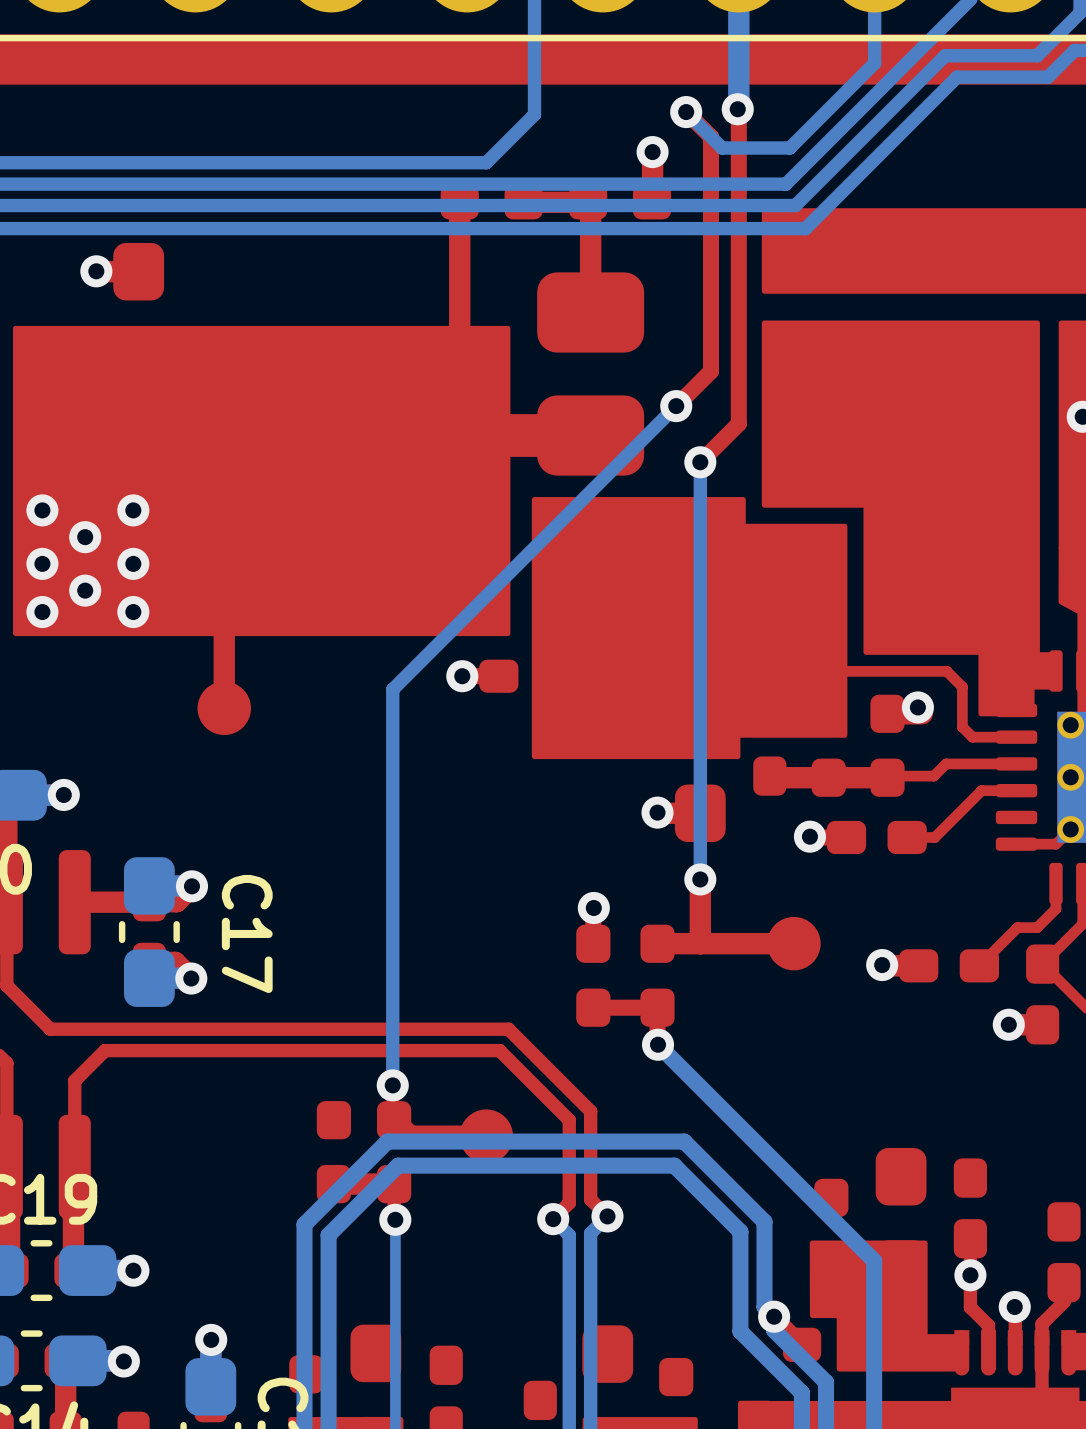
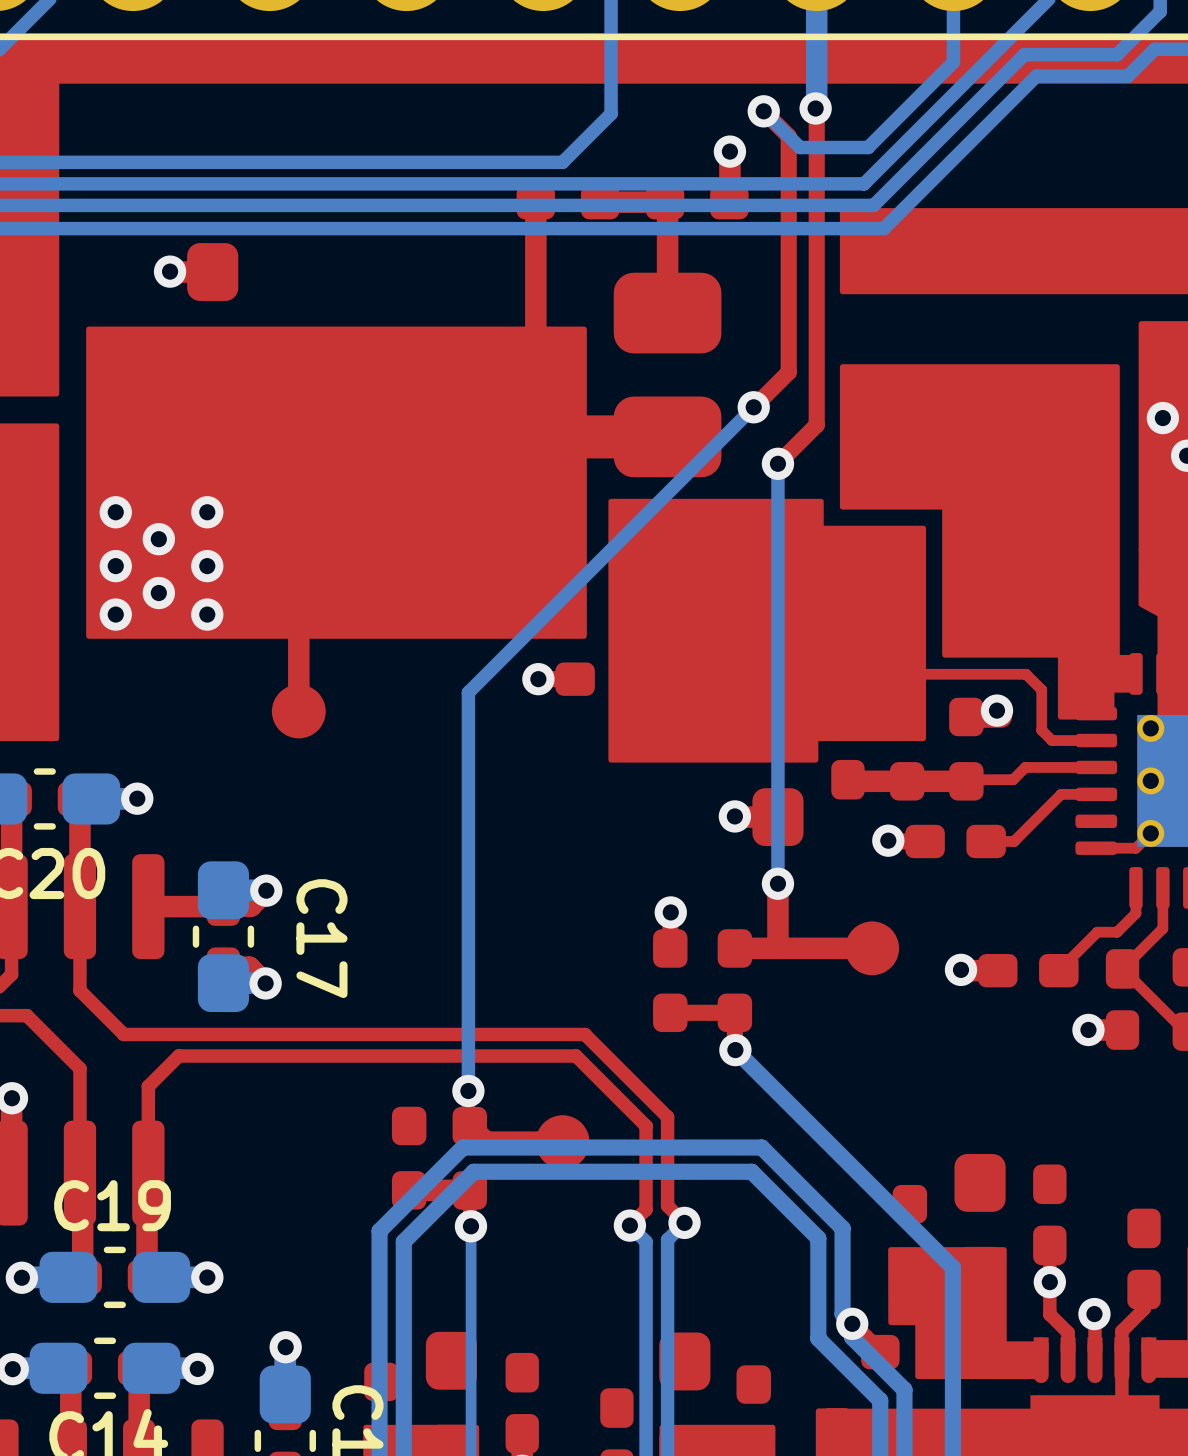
drawing shape: [761, 320, 1062, 717] -> [839, 364, 1142, 720]

